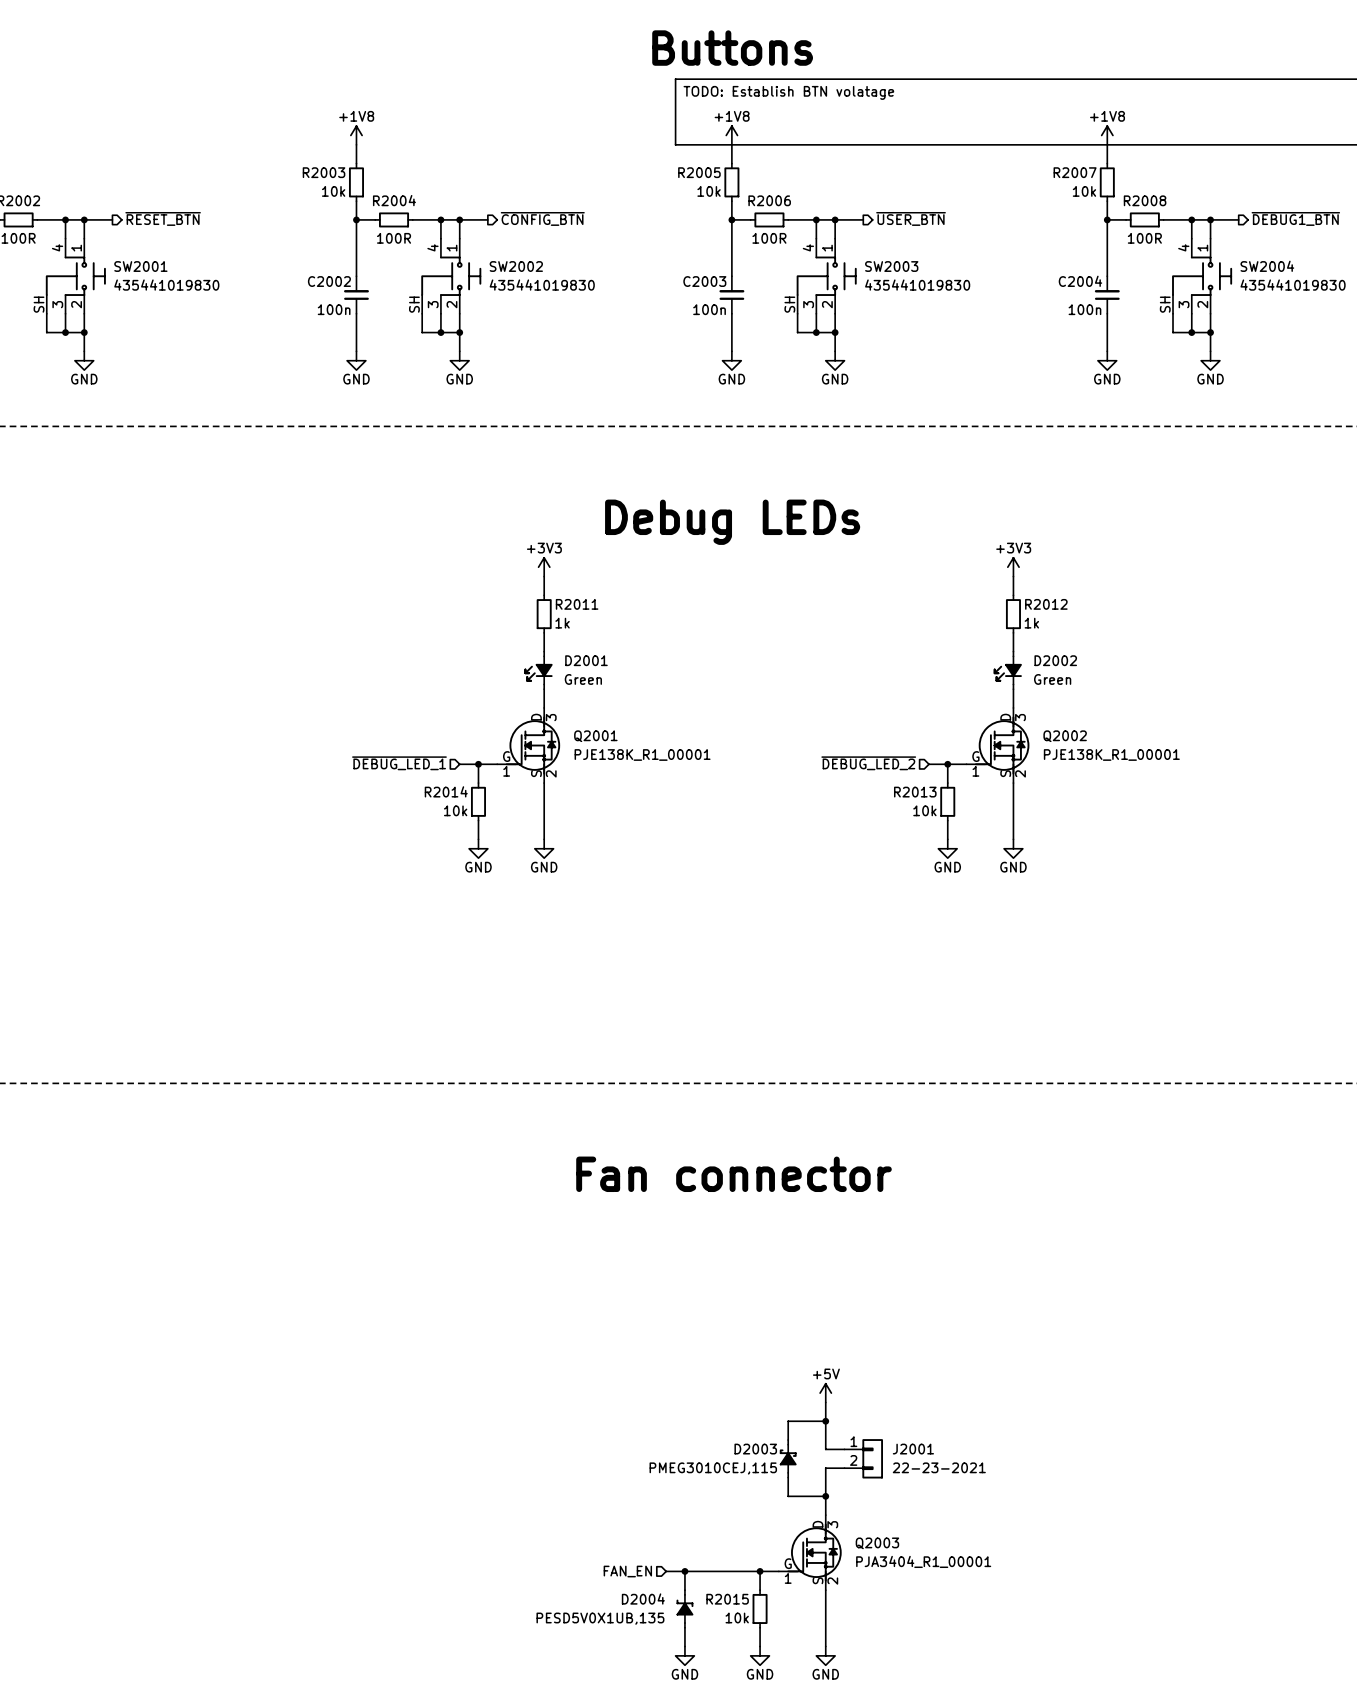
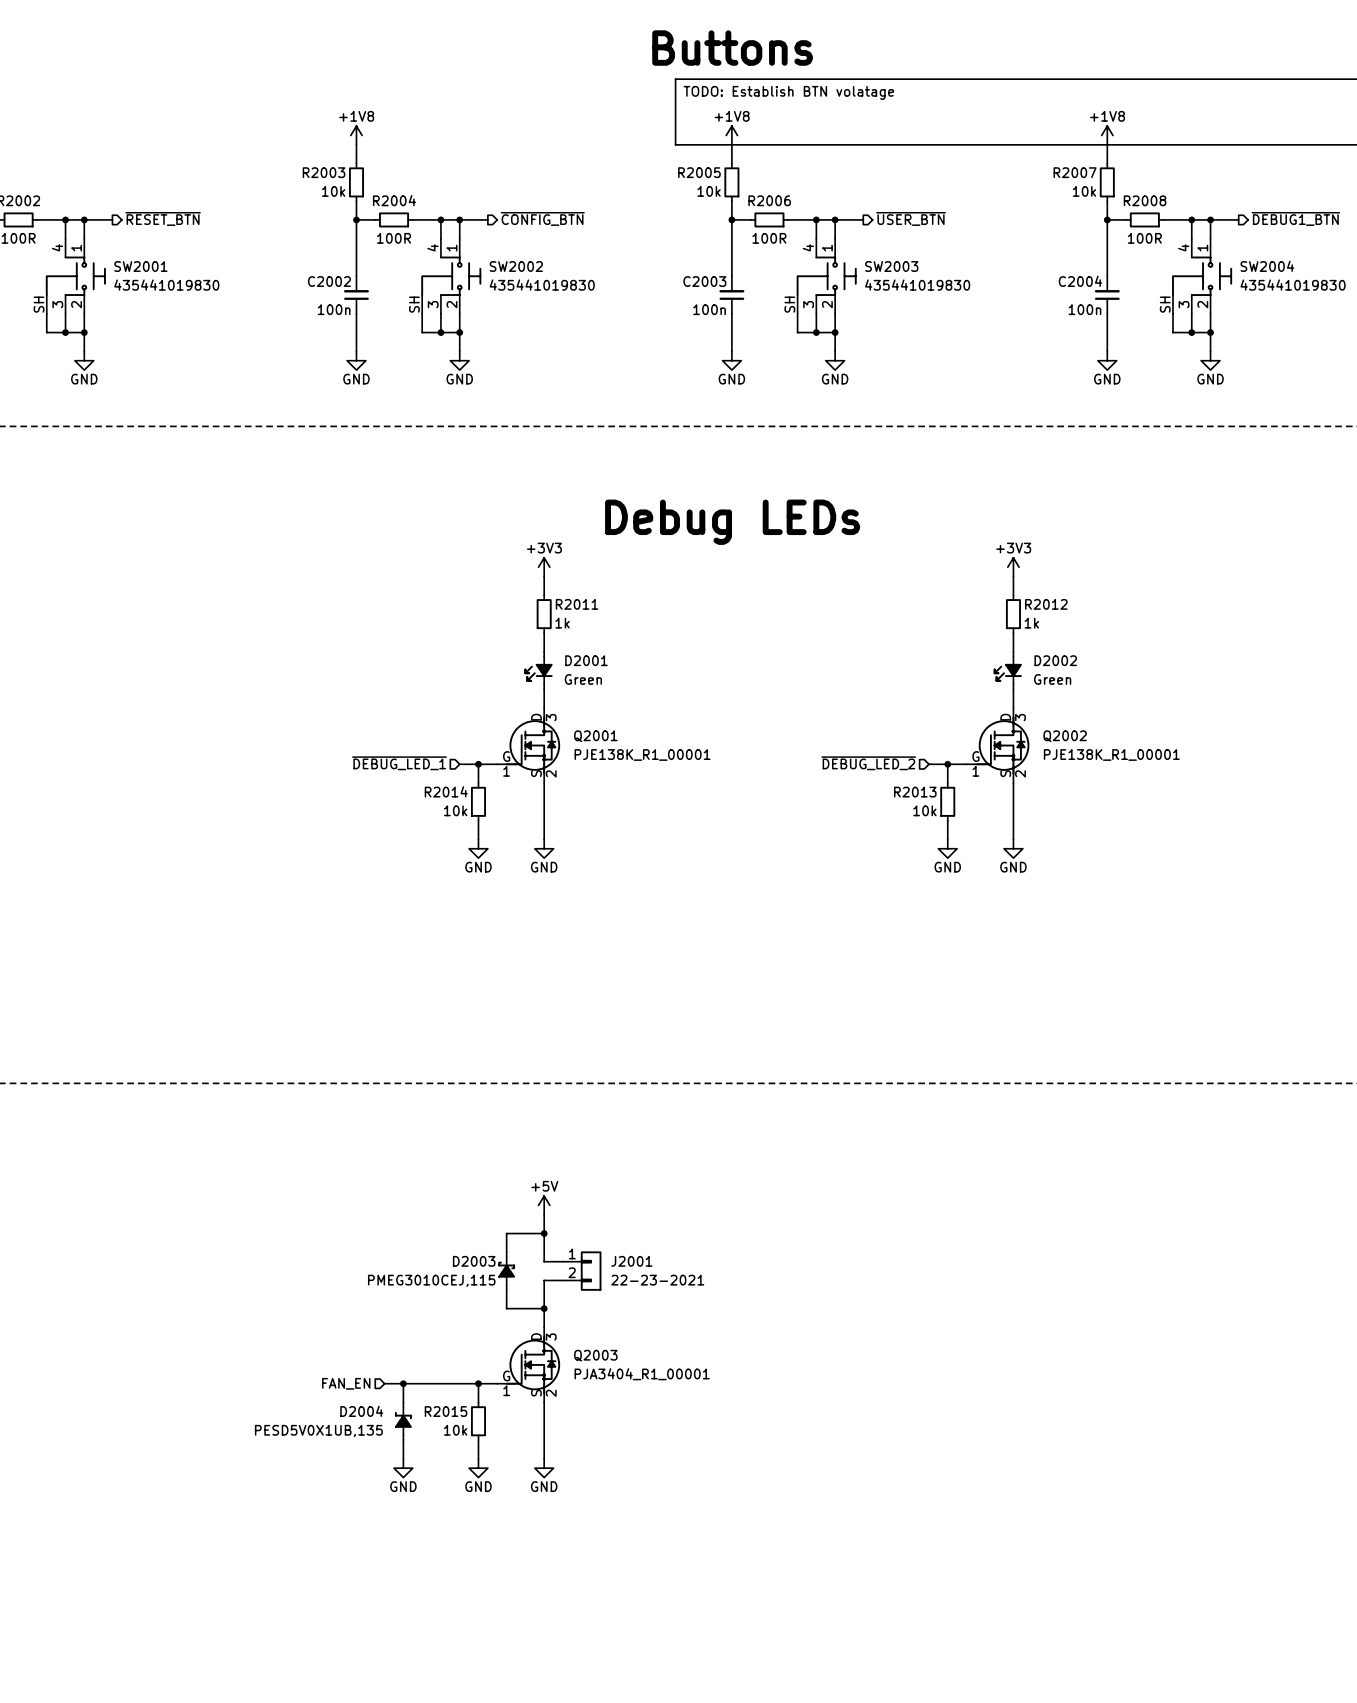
text: Fan connector (734, 1174) -> none
power symbol: none -> +5V (544, 1205)
wire: none -> (544, 1214) (544, 1261) (562, 1261)
wire: none -> (544, 1233) (506, 1233) (506, 1252)
junction: none -> (544, 1233)
wire: none -> (562, 1280) (544, 1280) (544, 1327)
wire: none -> (506, 1289) (506, 1308) (544, 1308)
junction: none -> (544, 1308)
hierarchical label: none -> FAN_EN (346, 1383)
wire: none -> (384, 1383) (497, 1383)
wire: none -> (403, 1383) (403, 1402)
junction: none -> (403, 1383)
wire: none -> (478, 1383) (478, 1402)
junction: none -> (478, 1383)
power symbol: +5V (825, 1393) -> none
wire: none -> (544, 1402) (544, 1458)
wire: (825, 1402) (825, 1449) (844, 1449) -> none
wire: (825, 1421) (788, 1421) (788, 1440) -> none
junction: (825, 1421) -> none
wire: none -> (403, 1440) (403, 1458)
wire: none -> (478, 1440) (478, 1458)
D2003 position: (788, 1458) -> (506, 1271)
J2001 position: (863, 1458) -> (582, 1271)
power symbol: none -> GND (403, 1468)
power symbol: none -> GND (478, 1468)
power symbol: none -> GND (544, 1468)
wire: (844, 1468) (825, 1468) (825, 1515) -> none
wire: (788, 1477) (788, 1496) (825, 1496) -> none
junction: (825, 1496) -> none
Q2003 position: (810, 1552) -> (528, 1364)
hierarchical label: FAN_EN (627, 1571) -> none
wire: (666, 1571) (778, 1571) -> none
wire: (684, 1571) (684, 1590) -> none
junction: (684, 1571) -> none
wire: (760, 1571) (760, 1590) -> none
junction: (760, 1571) -> none
wire: (825, 1590) (825, 1646) -> none
D2004 position: (684, 1608) -> (403, 1421)
R2015 position: (760, 1608) -> (478, 1421)
wire: (684, 1627) (684, 1646) -> none
wire: (760, 1627) (760, 1646) -> none
power symbol: GND (684, 1655) -> none
power symbol: GND (760, 1655) -> none
power symbol: GND (825, 1655) -> none

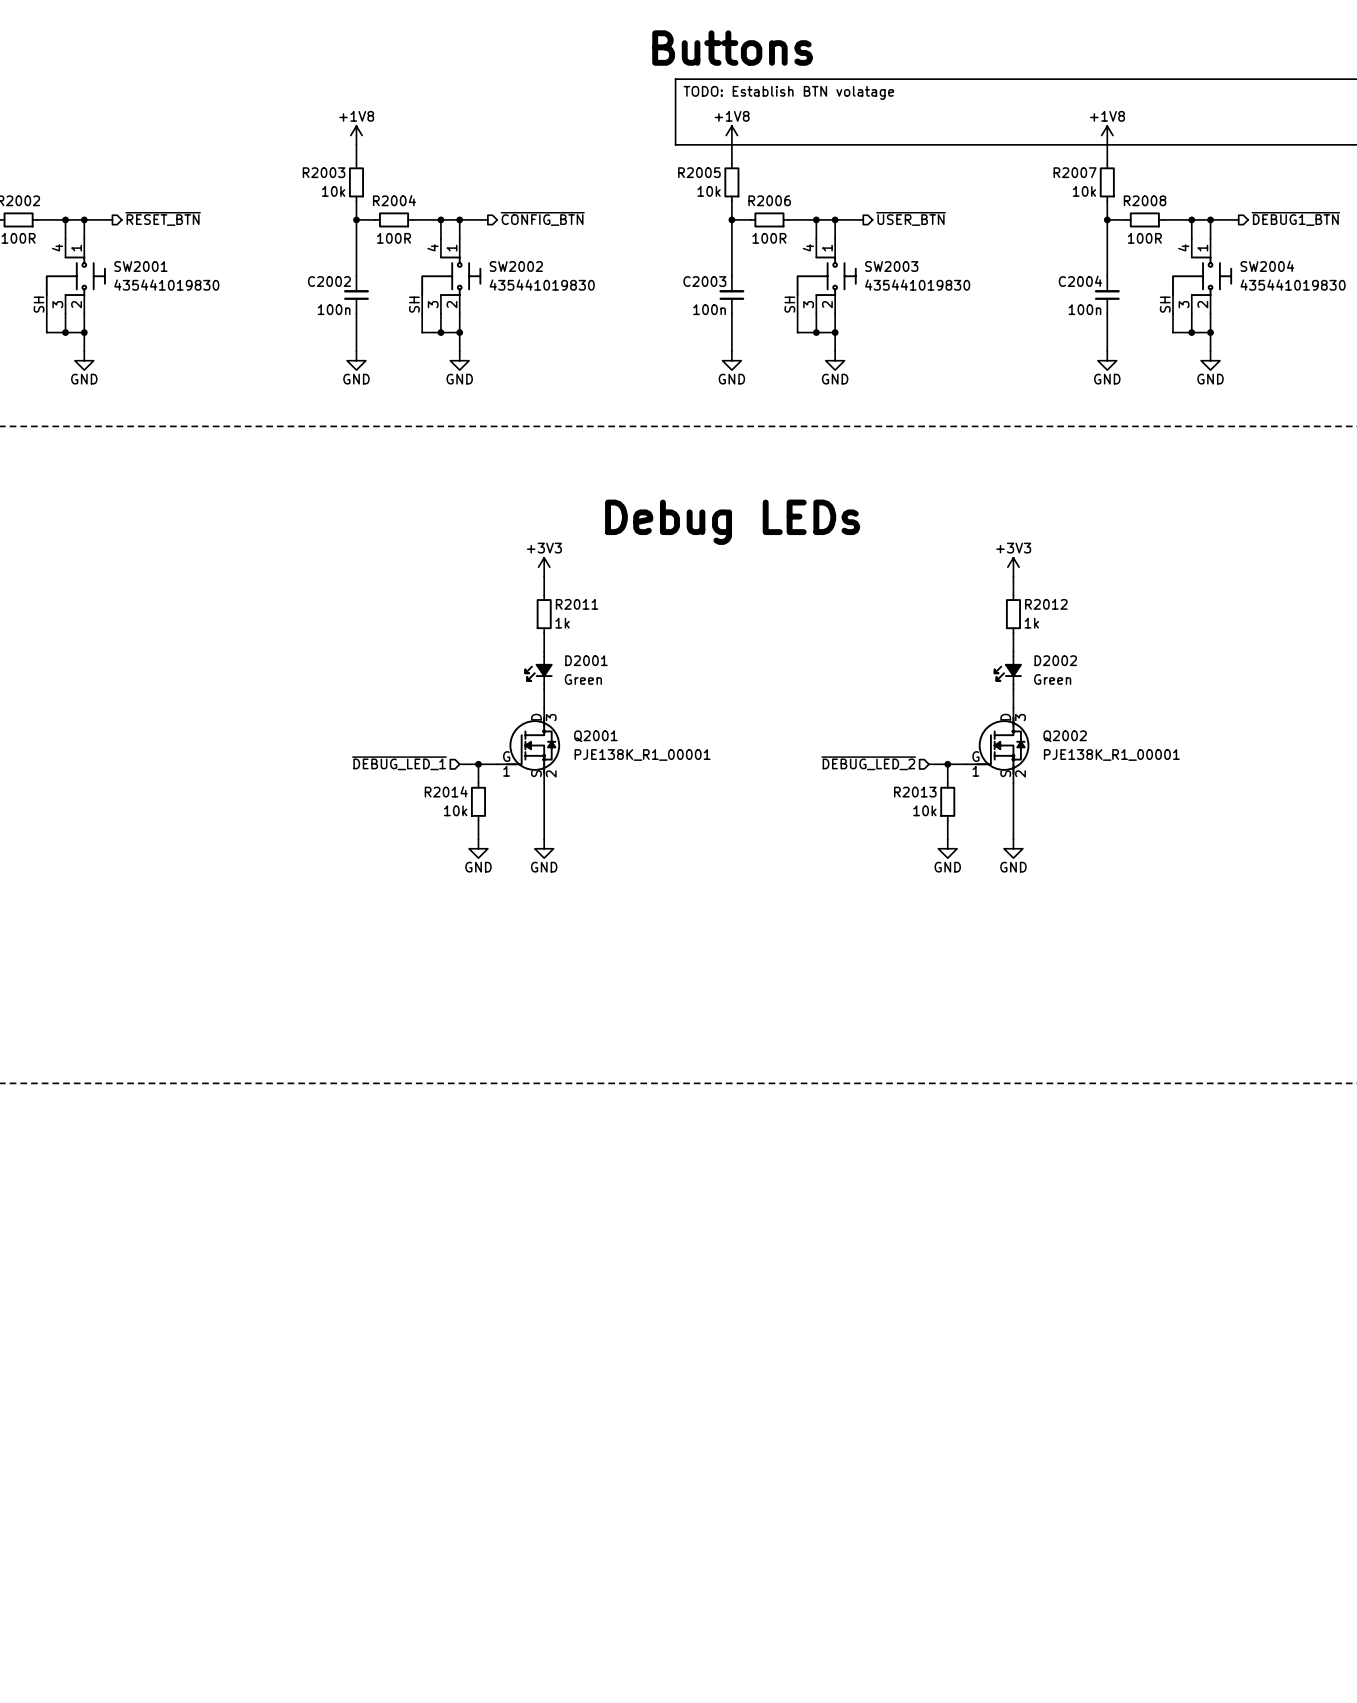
power symbol: +5V (544, 1205) -> none
wire: (544, 1214) (544, 1261) (562, 1261) -> none
wire: (544, 1233) (506, 1233) (506, 1252) -> none
junction: (544, 1233) -> none
D2003: (506, 1271) -> none
J2001: (582, 1271) -> none
wire: (562, 1280) (544, 1280) (544, 1327) -> none
wire: (506, 1289) (506, 1308) (544, 1308) -> none
junction: (544, 1308) -> none
Q2003: (528, 1364) -> none
hierarchical label: FAN_EN (346, 1383) -> none
wire: (384, 1383) (497, 1383) -> none
wire: (403, 1383) (403, 1402) -> none
junction: (403, 1383) -> none
wire: (478, 1383) (478, 1402) -> none
junction: (478, 1383) -> none
wire: (544, 1402) (544, 1458) -> none
D2004: (403, 1421) -> none
R2015: (478, 1421) -> none
wire: (403, 1440) (403, 1458) -> none
wire: (478, 1440) (478, 1458) -> none
power symbol: GND (403, 1468) -> none
power symbol: GND (478, 1468) -> none
power symbol: GND (544, 1468) -> none

